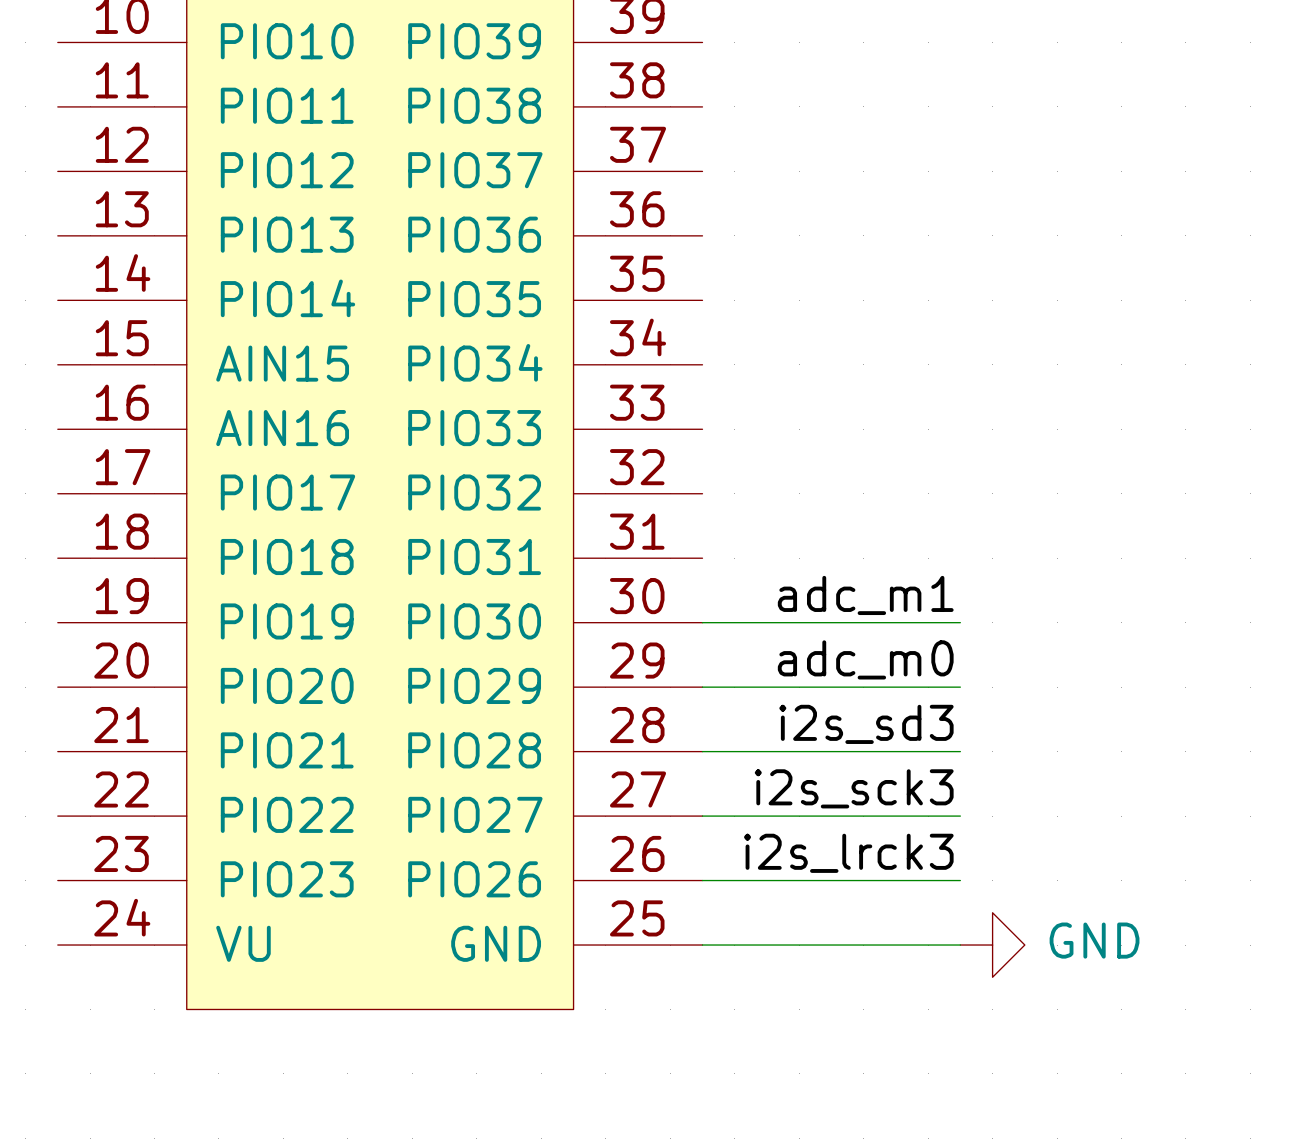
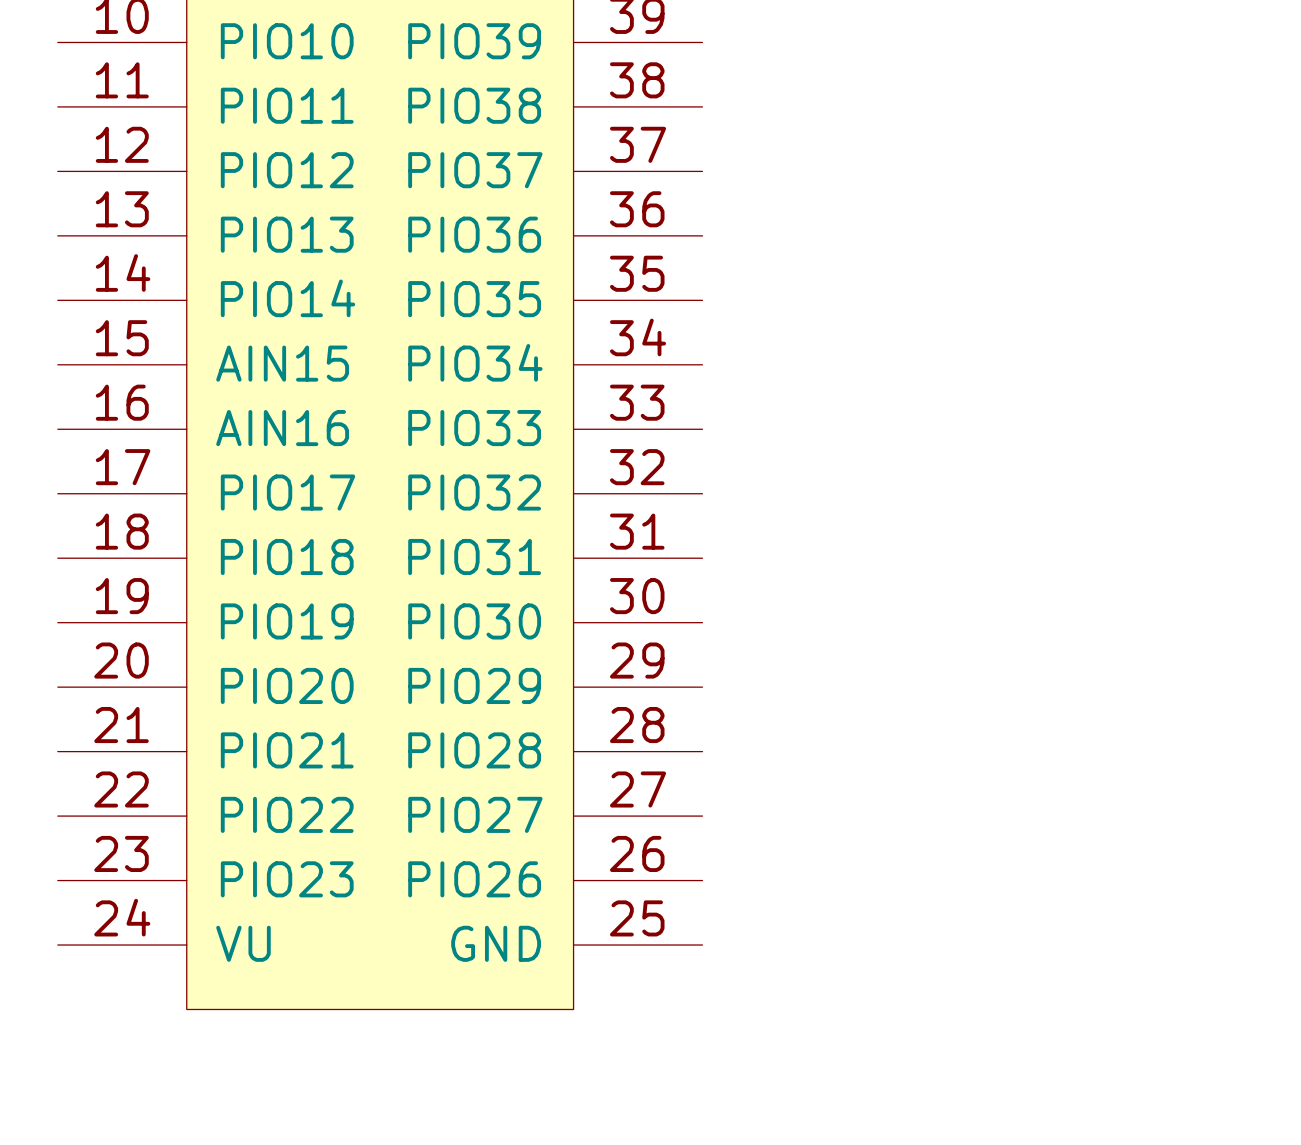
label: adc_m1 (865, 595) -> none
wire: (702, 622) (960, 622) -> none
label: adc_m0 (865, 659) -> none
wire: (702, 687) (960, 687) -> none
label: i2s_sd3 (866, 724) -> none
wire: (702, 751) (960, 751) -> none
label: i2s_sck3 (854, 788) -> none
wire: (702, 816) (960, 816) -> none
label: i2s_lrck3 (848, 853) -> none
wire: (702, 880) (960, 880) -> none
wire: (702, 945) (960, 945) -> none
power symbol: GND (992, 945) -> none

